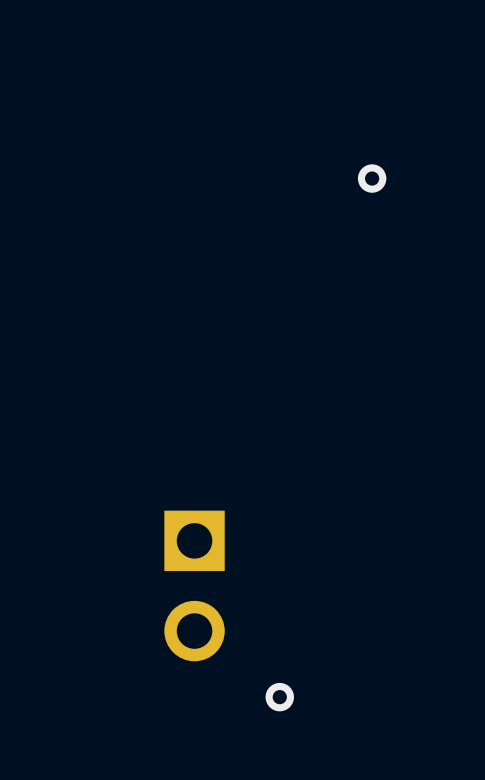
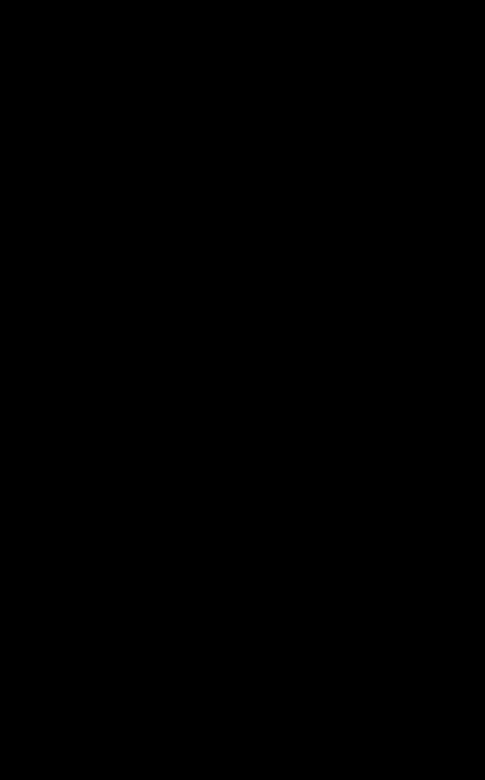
via: (372, 178) -> none
part: (194, 585) -> none
via: (279, 697) -> none

